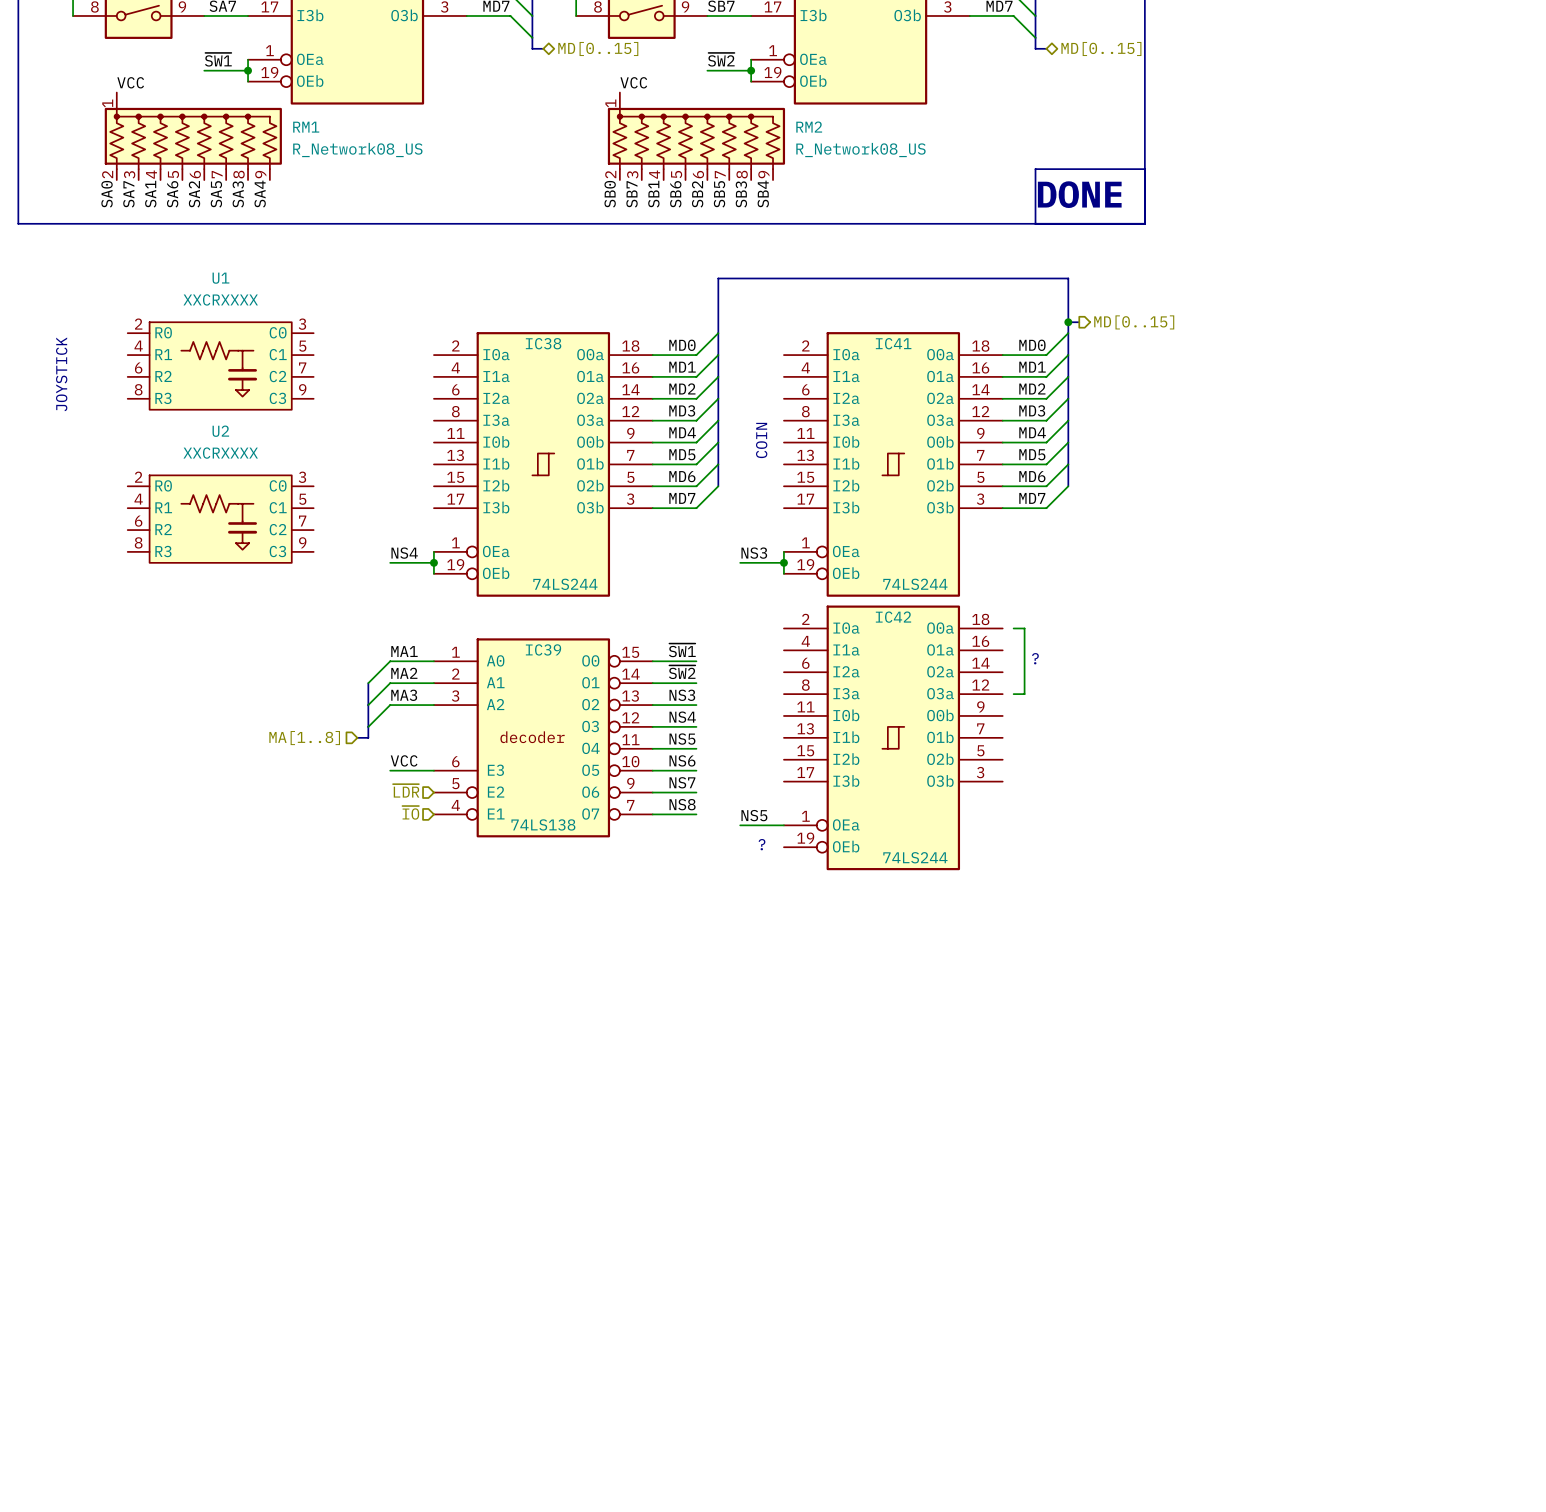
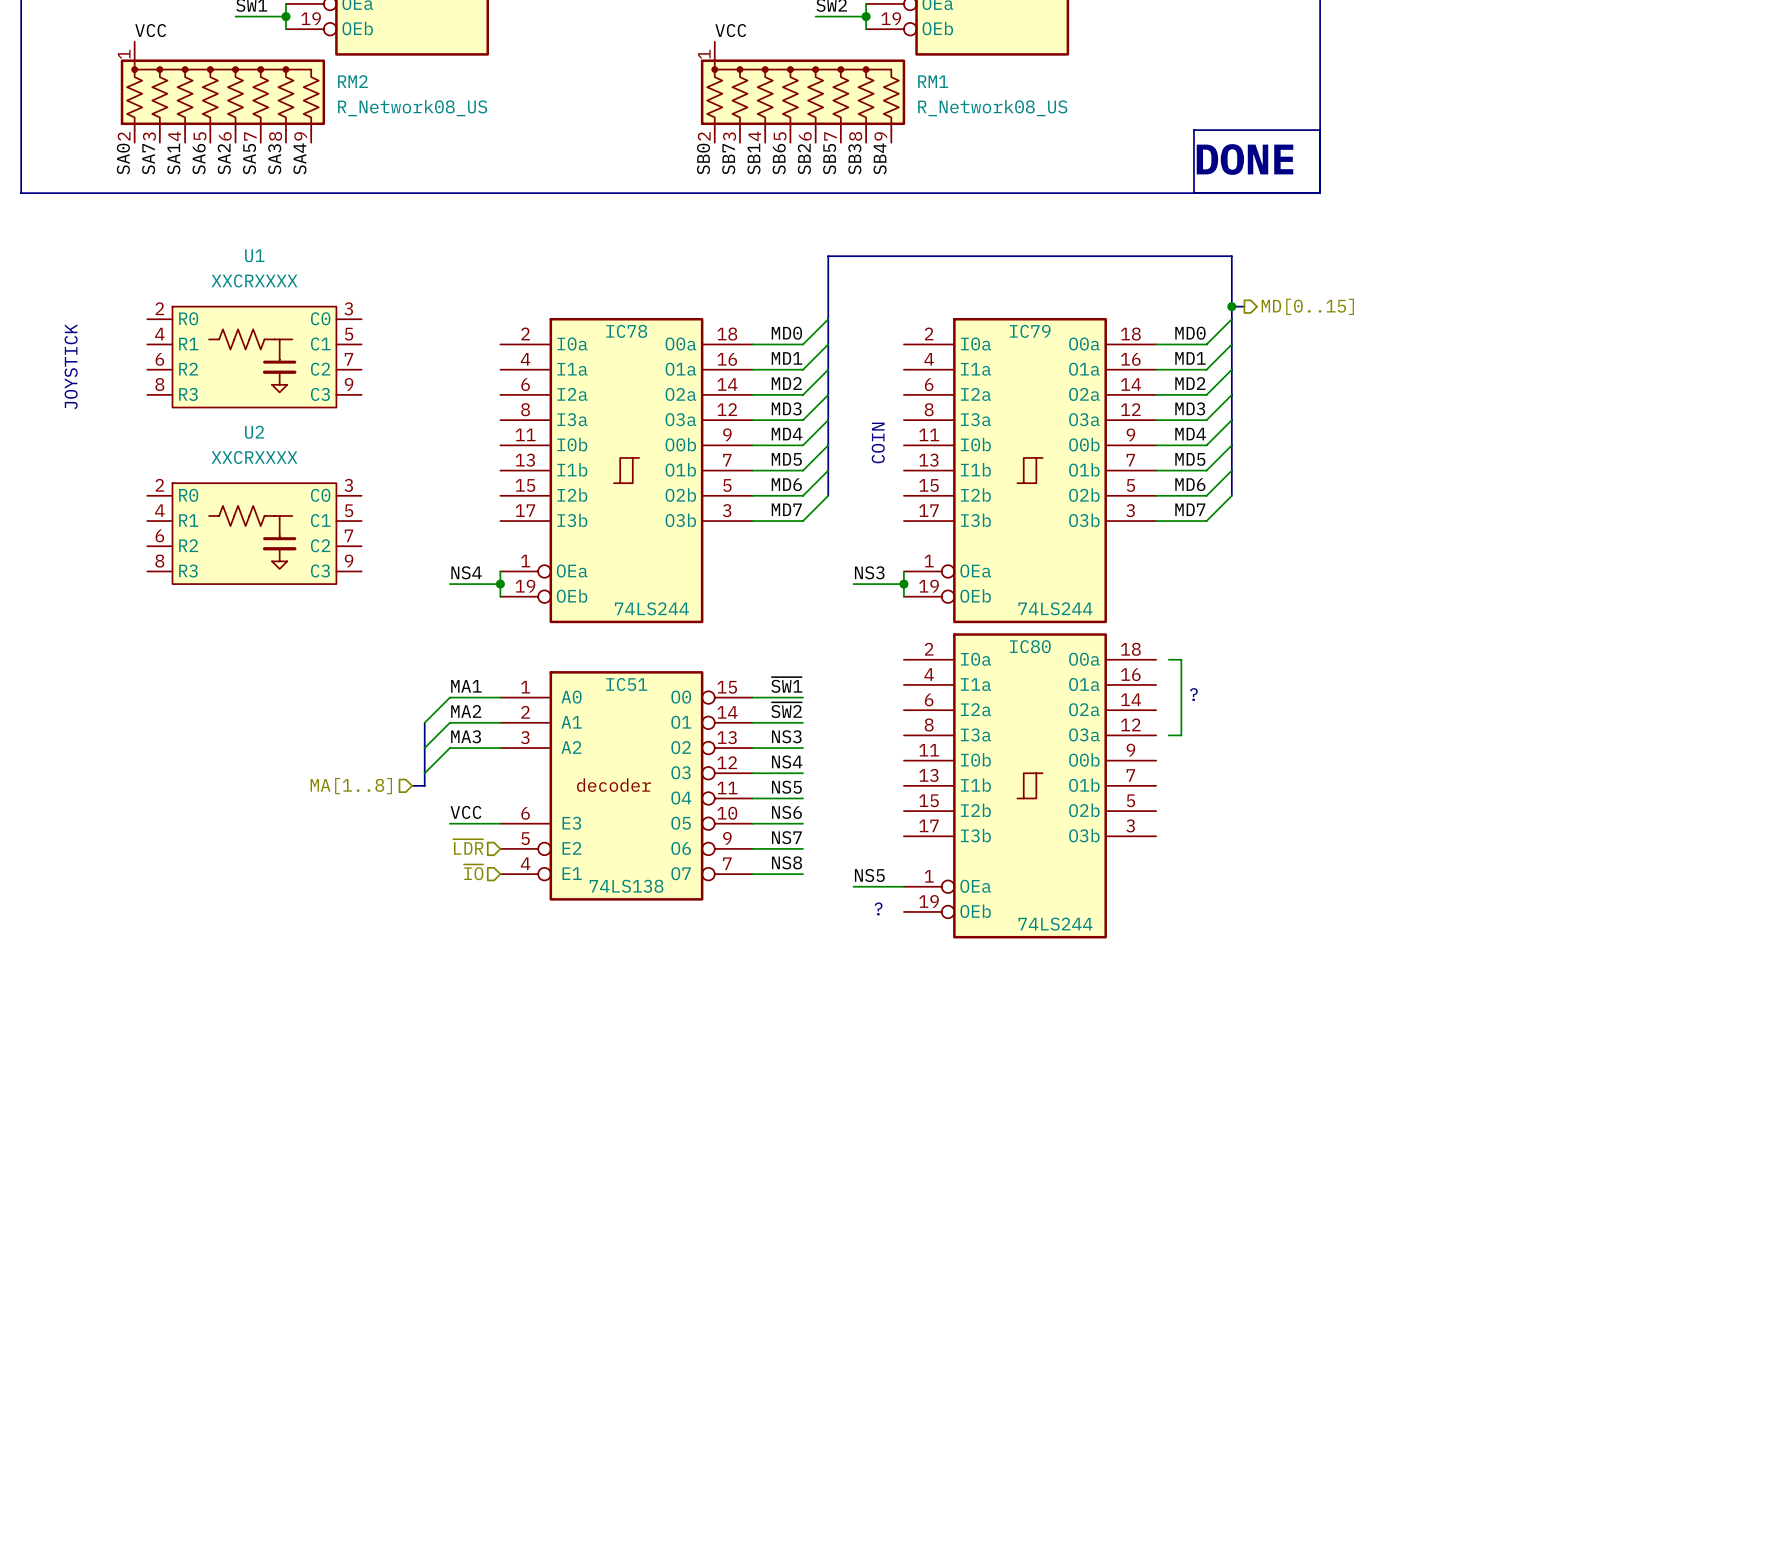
RM1 name: RM1 (306, 127) -> RM2 (352, 81)
RM2 name: RM2 (809, 127) -> RM1 (933, 81)
IC38 name: IC38 (543, 343) -> IC78 (626, 331)
IC41 name: IC41 (893, 343) -> IC79 (1030, 331)
IC42 name: IC42 (893, 617) -> IC80 (1030, 646)
IC39 name: IC39 (543, 649) -> IC51 (626, 684)

